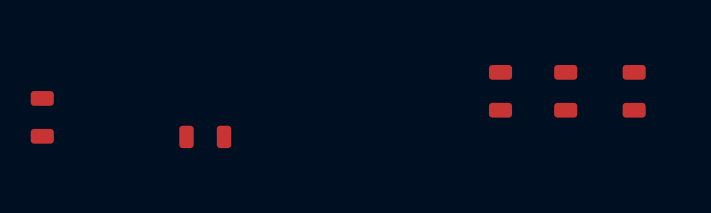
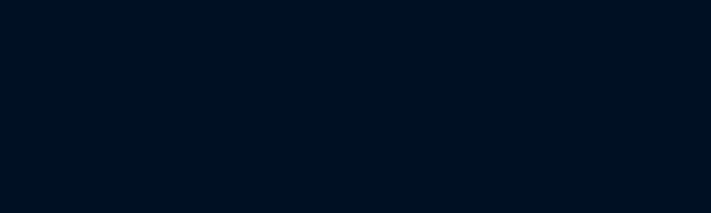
part: (500, 91) -> none
part: (565, 91) -> none
part: (634, 91) -> none
part: (42, 117) -> none
part: (205, 136) -> none

